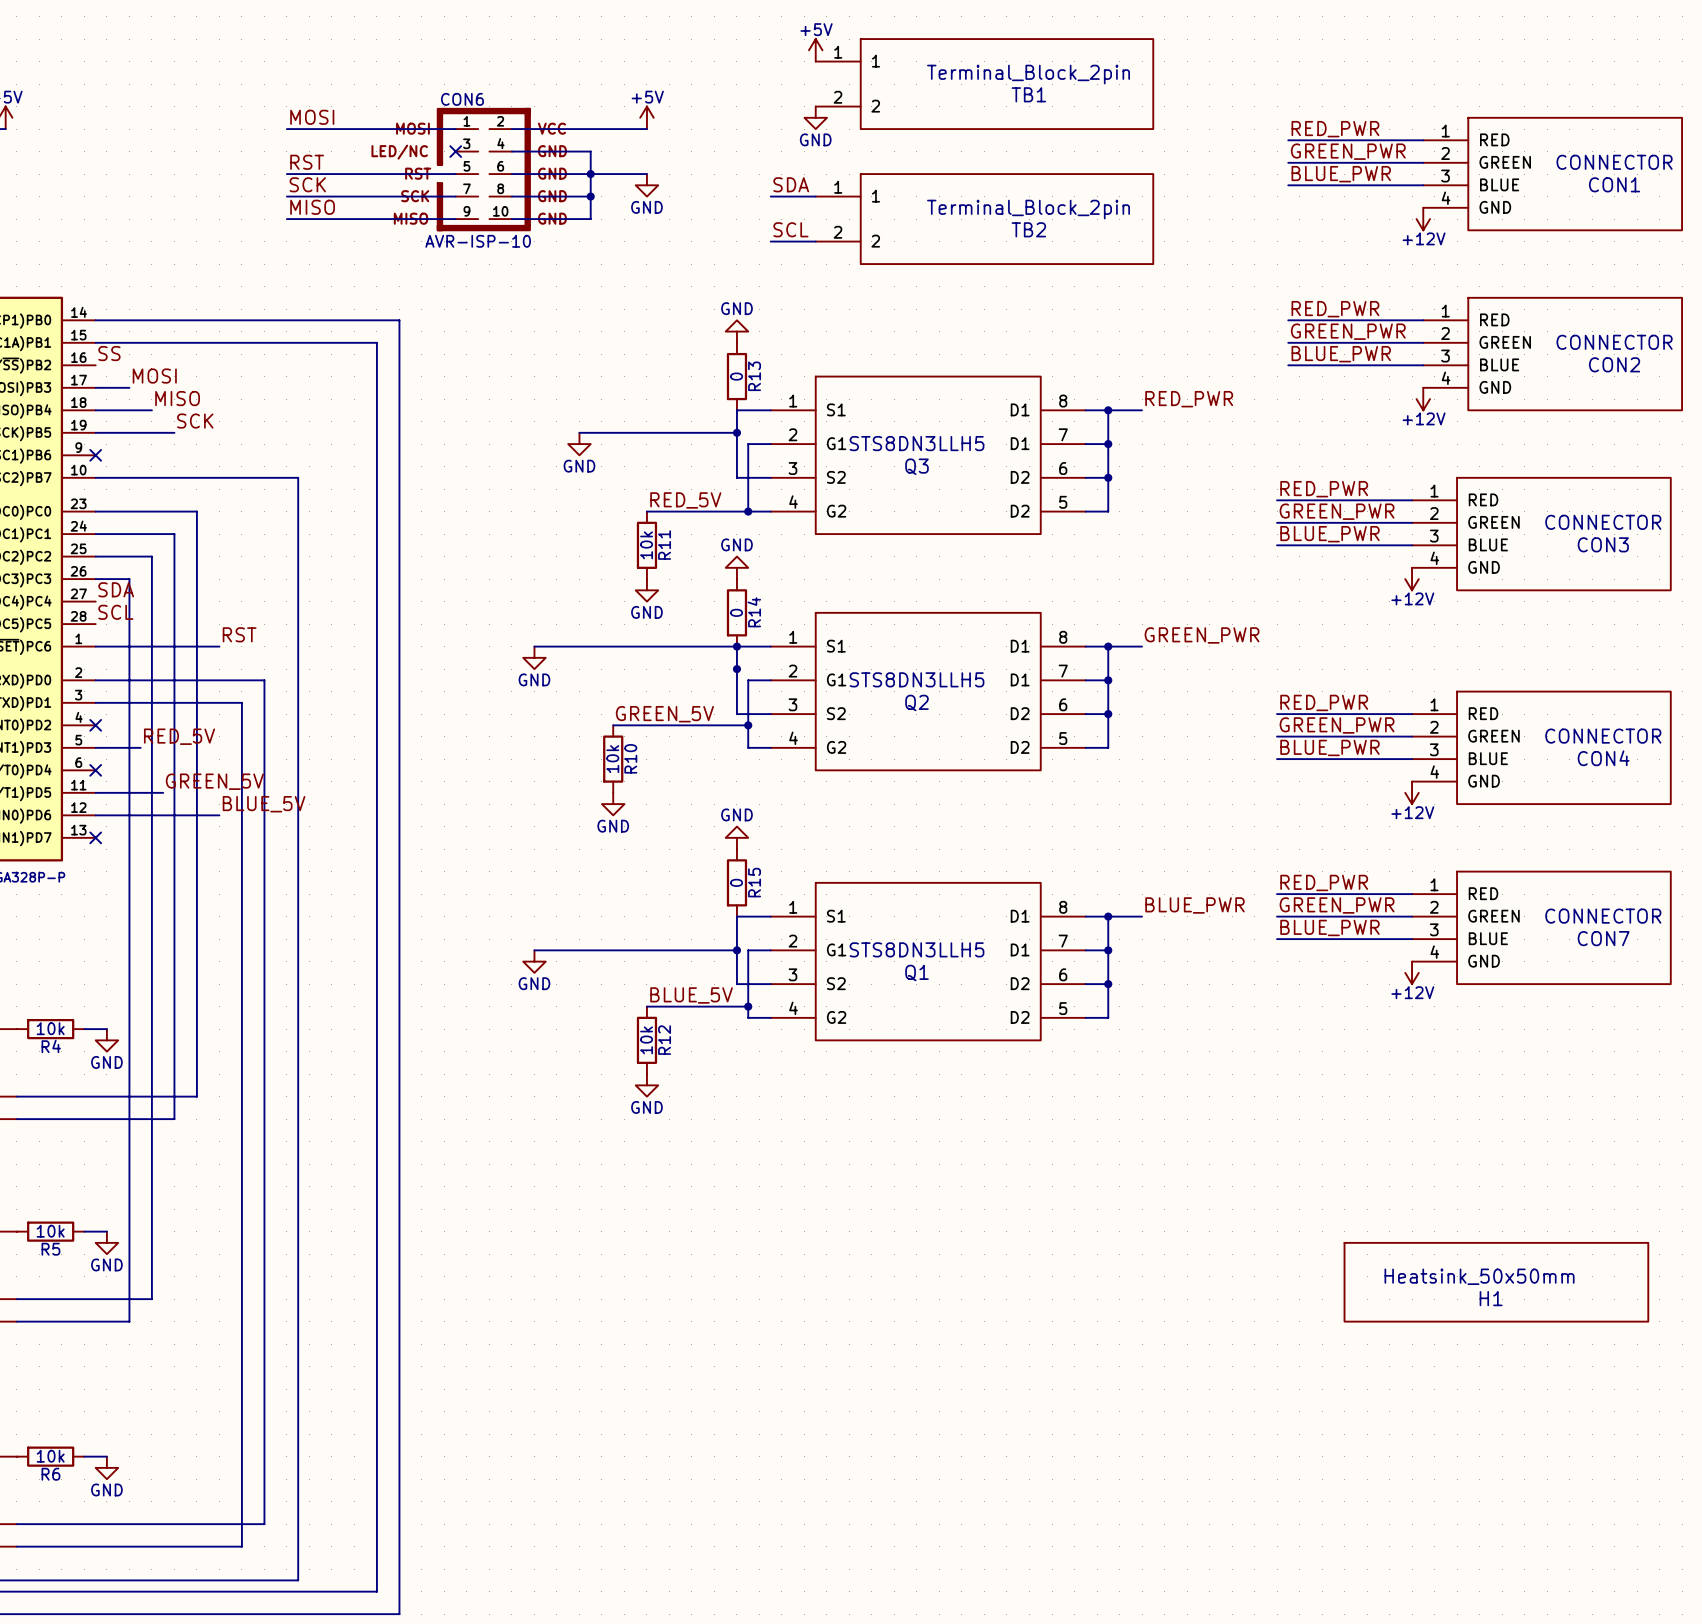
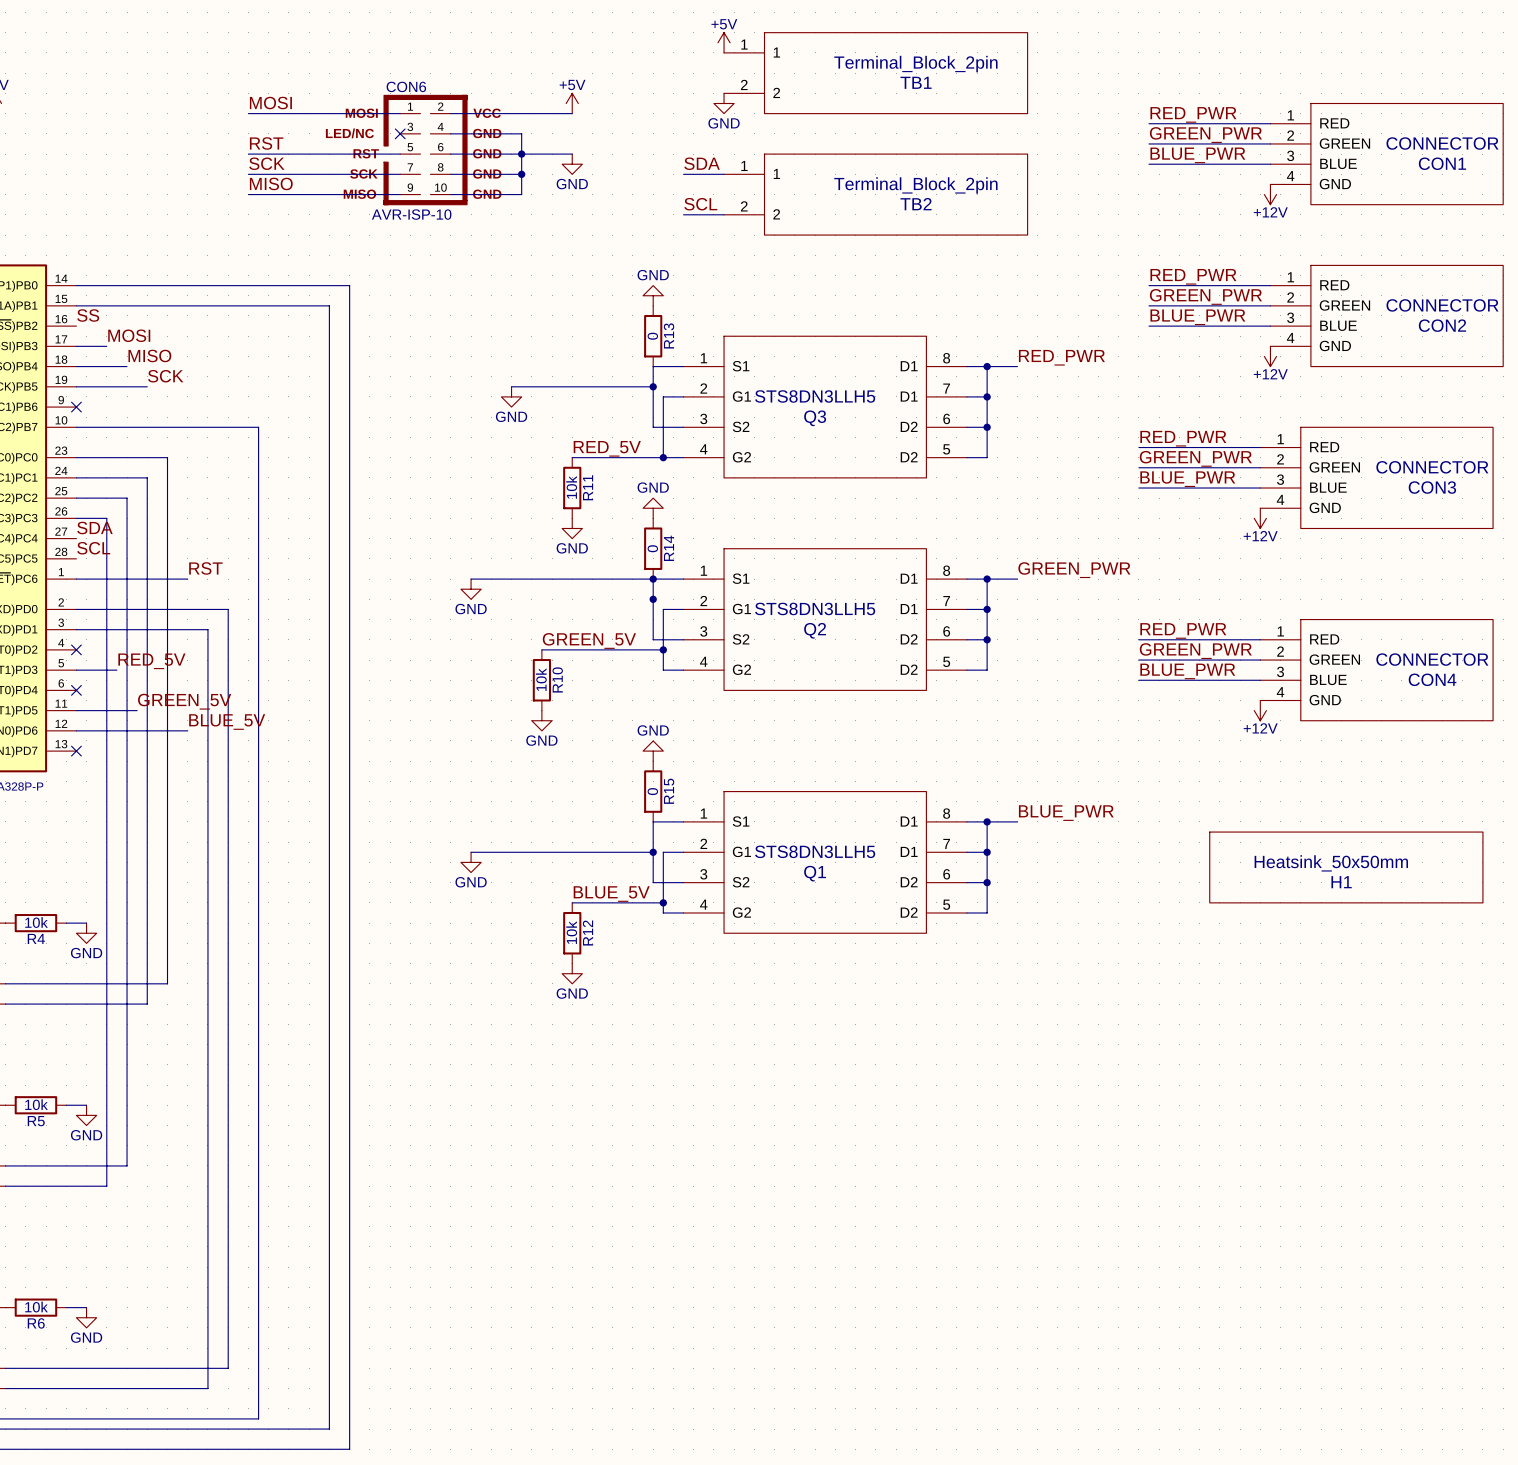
label: RED_PWR (1324, 882) -> none
wire: (1277, 894) (1412, 894) -> none
label: GREEN_PWR (1337, 905) -> none
wire: (1277, 916) (1412, 916) -> none
label: BLUE_PWR (1329, 927) -> none
CON7: CONNECTOR (1541, 927) -> none
wire: (1277, 939) (1412, 939) -> none
power symbol: +12V (1412, 972) -> none
H1 position: (1496, 1282) -> (1346, 867)

